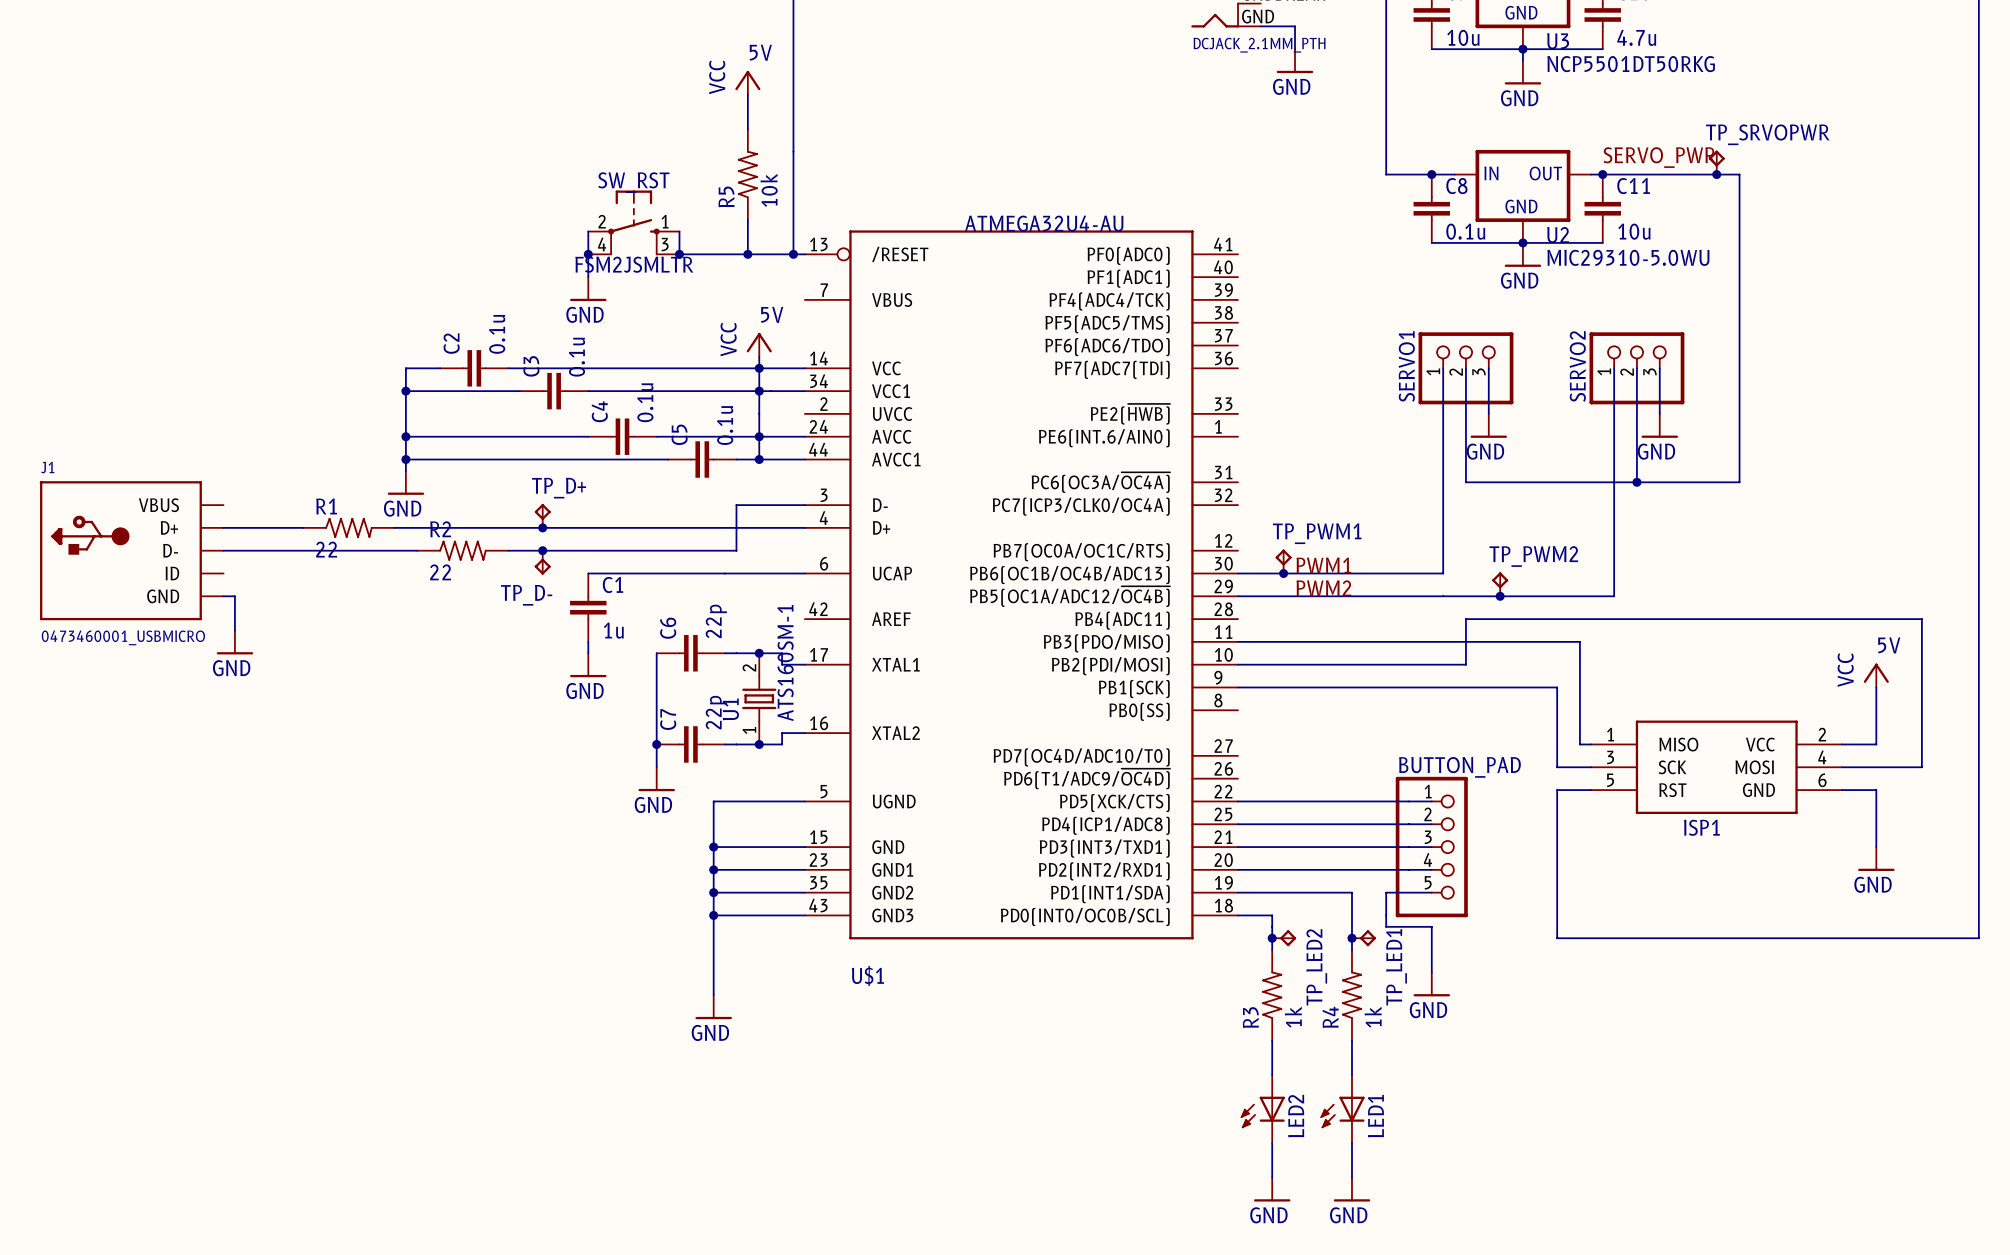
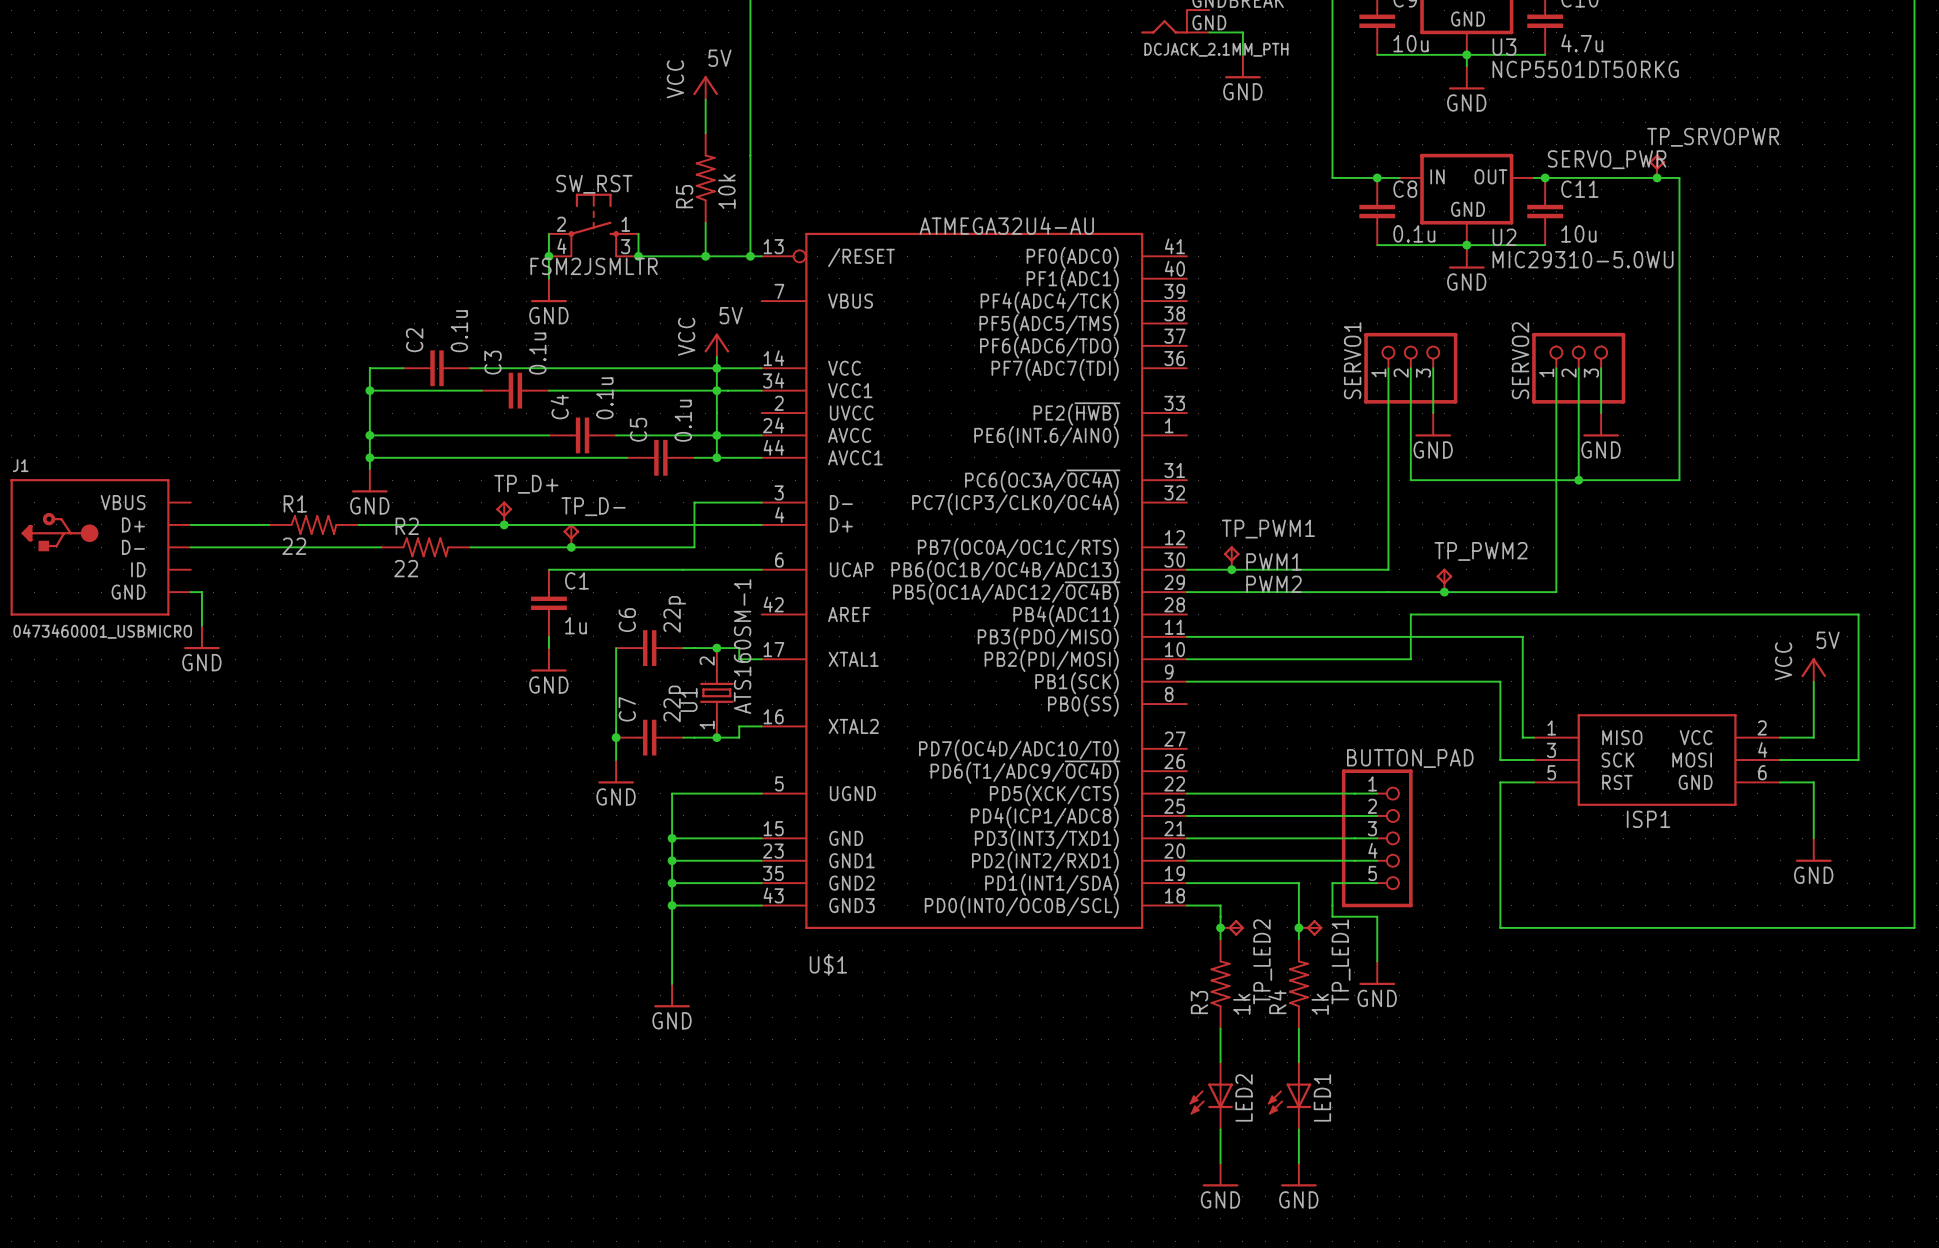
junction: (542, 550) -> none
junction: none -> (571, 547)
TP_D- position: (542, 562) -> (571, 535)
TP_D- rotation: 0° (542, 566) -> 180° (571, 531)

